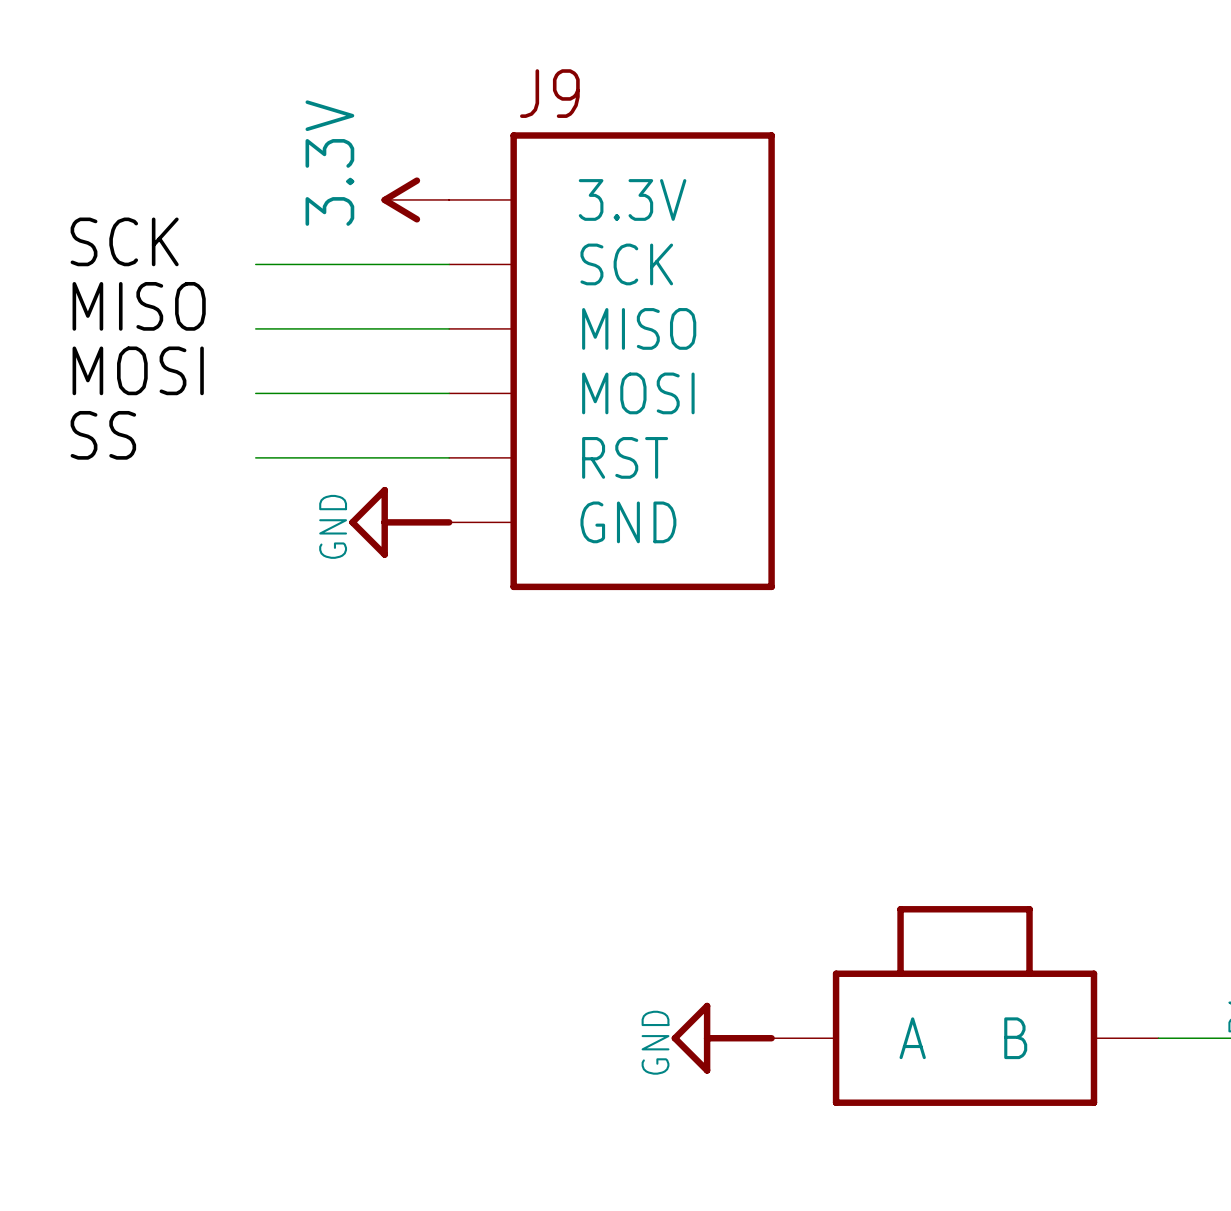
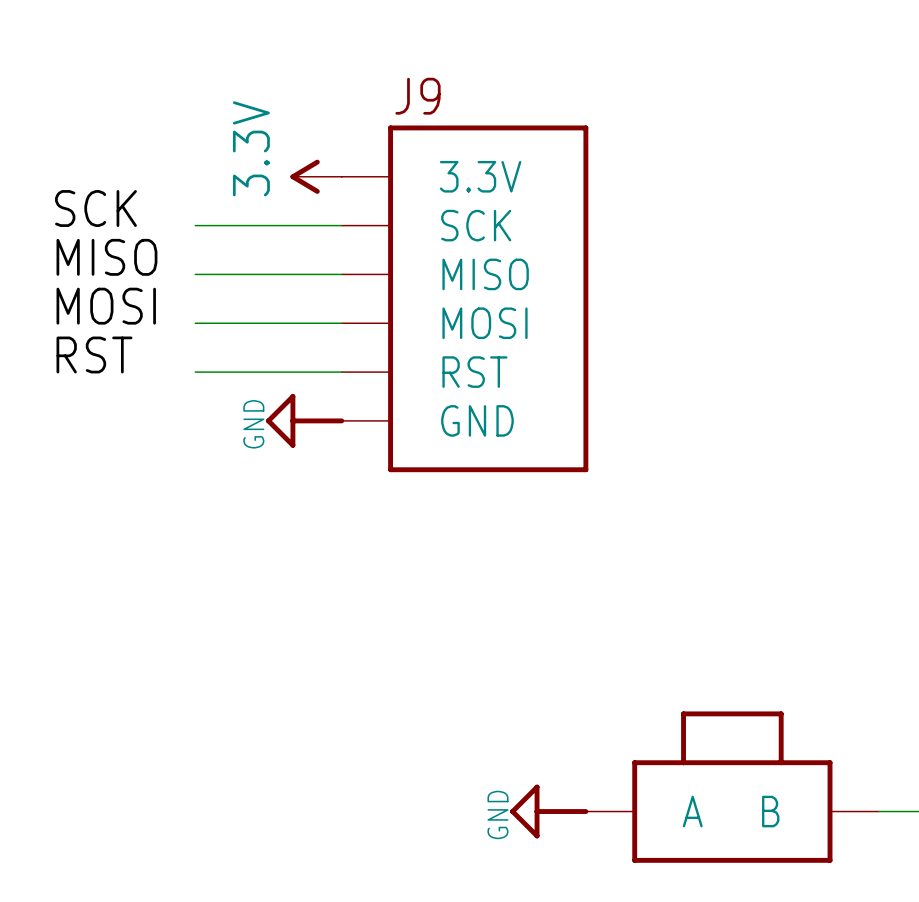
label: SS (103, 435) -> RST (94, 354)

